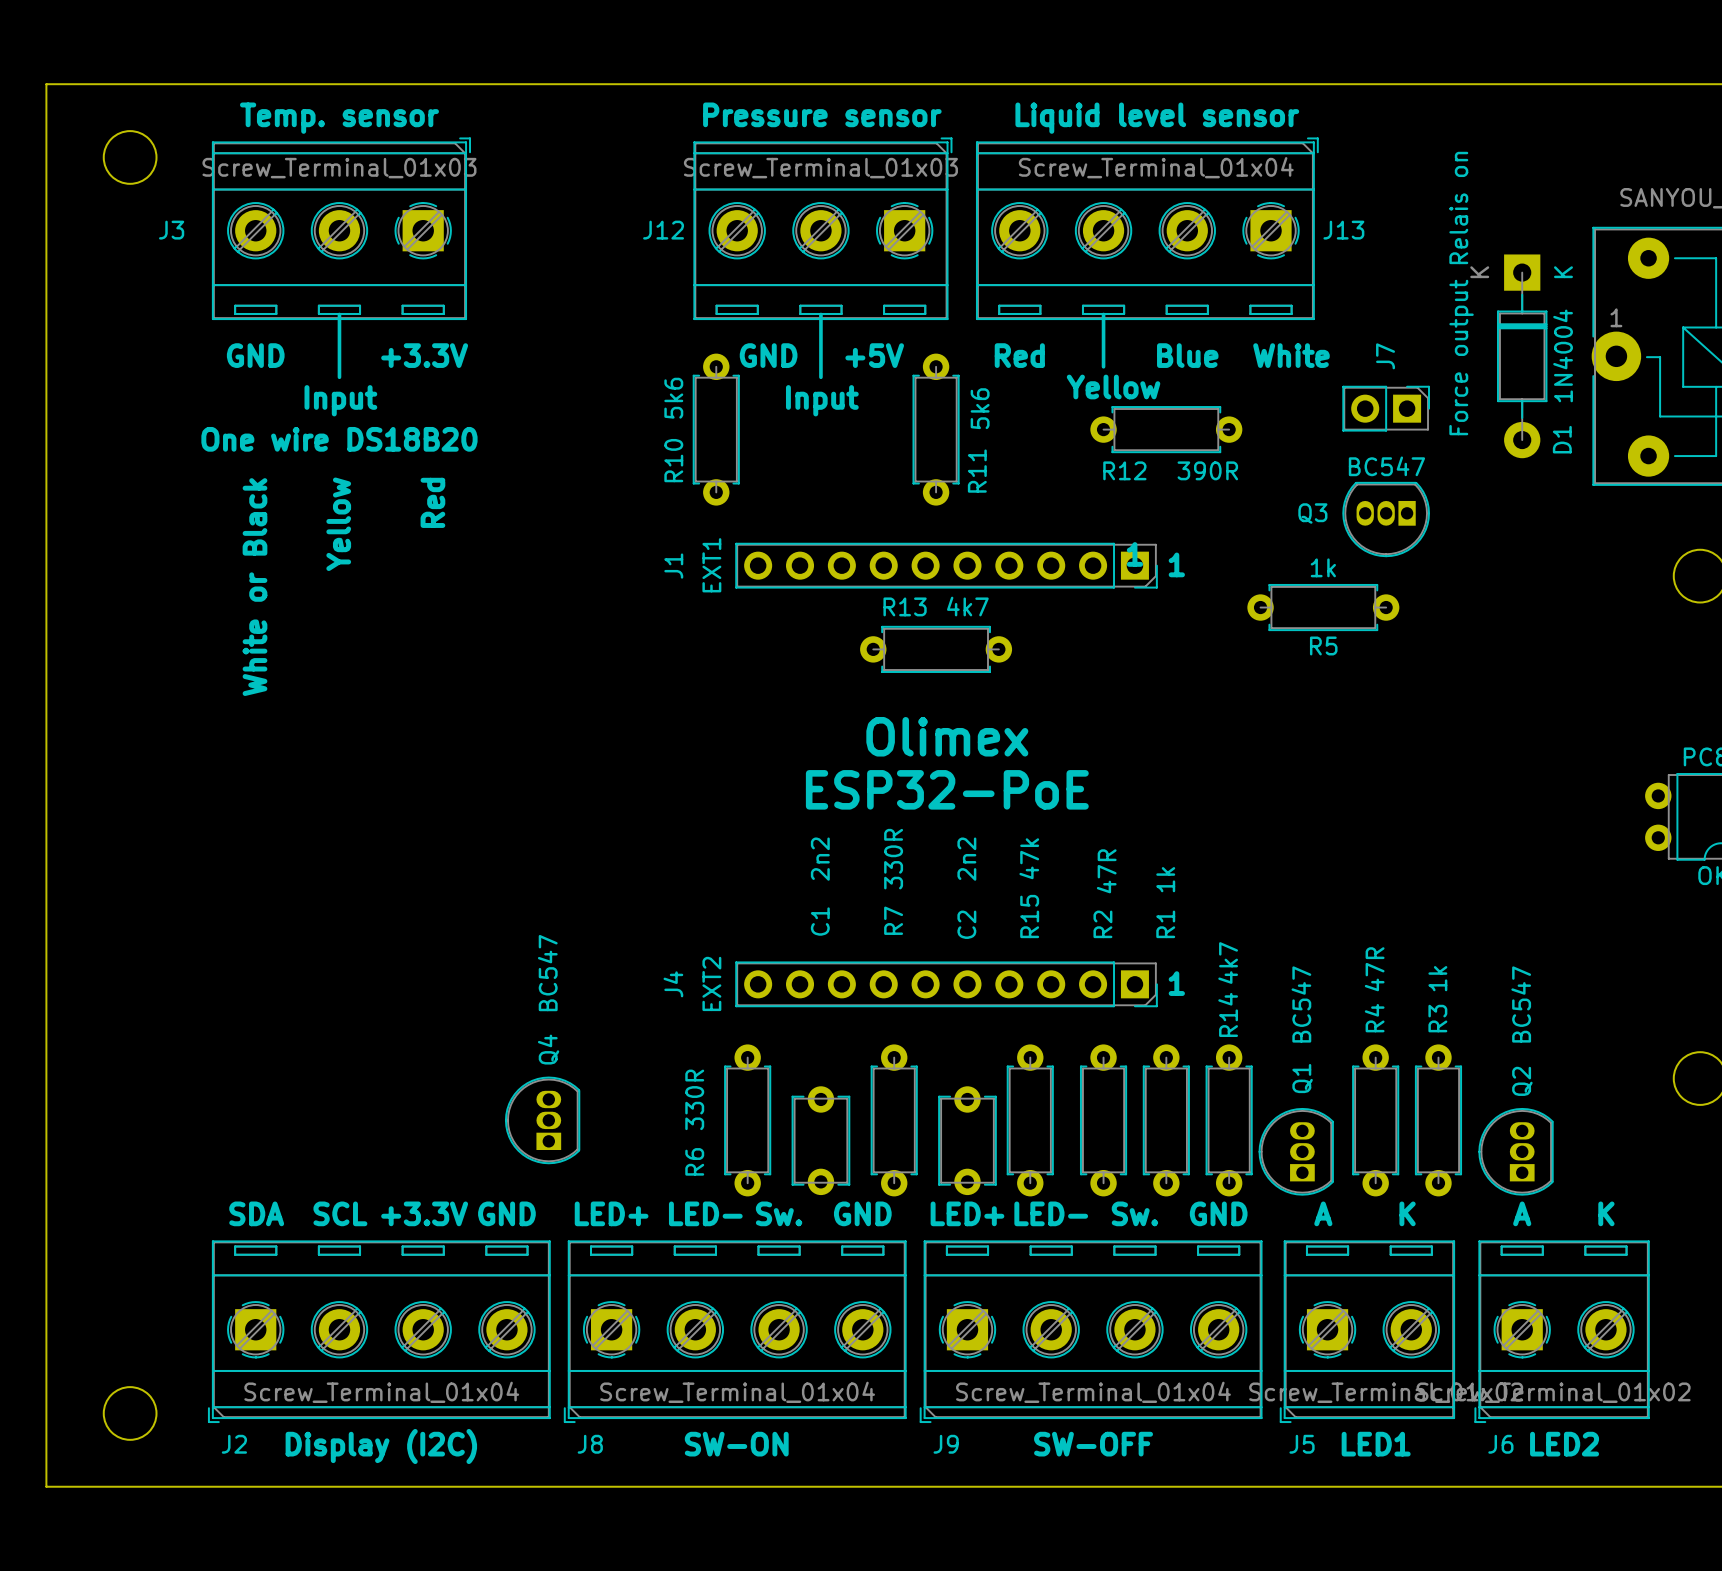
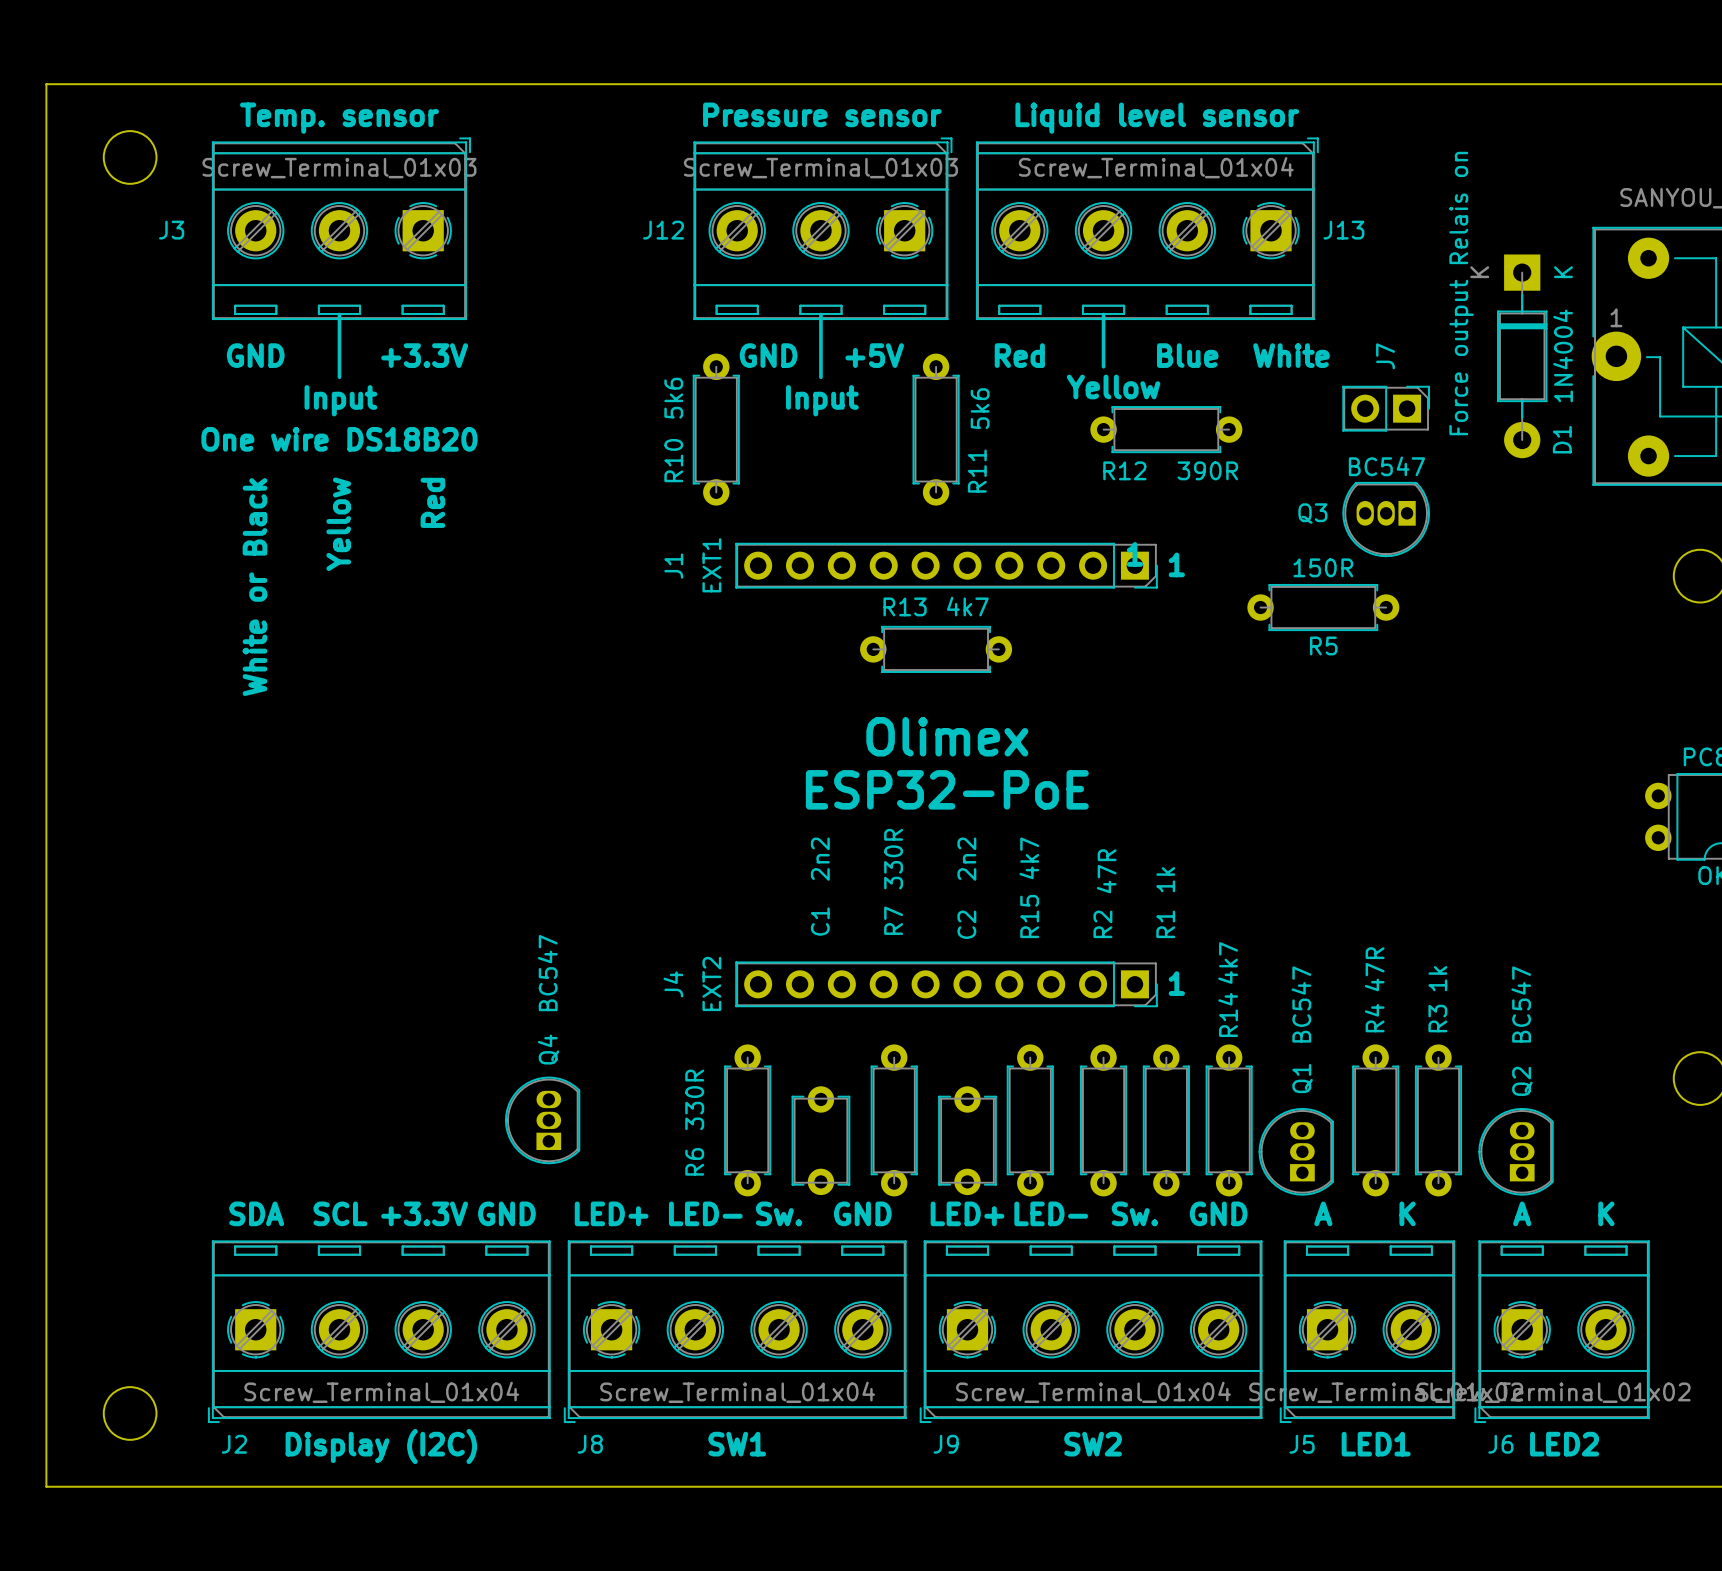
R5 value: 1k (1323, 567) -> 150R (1323, 567)
R15 value: 47k (1029, 858) -> 4k7 (1029, 858)
text: SW-ON (736, 1444) -> SW1 (737, 1444)
text: SW-OFF (1093, 1444) -> SW2 (1093, 1444)

